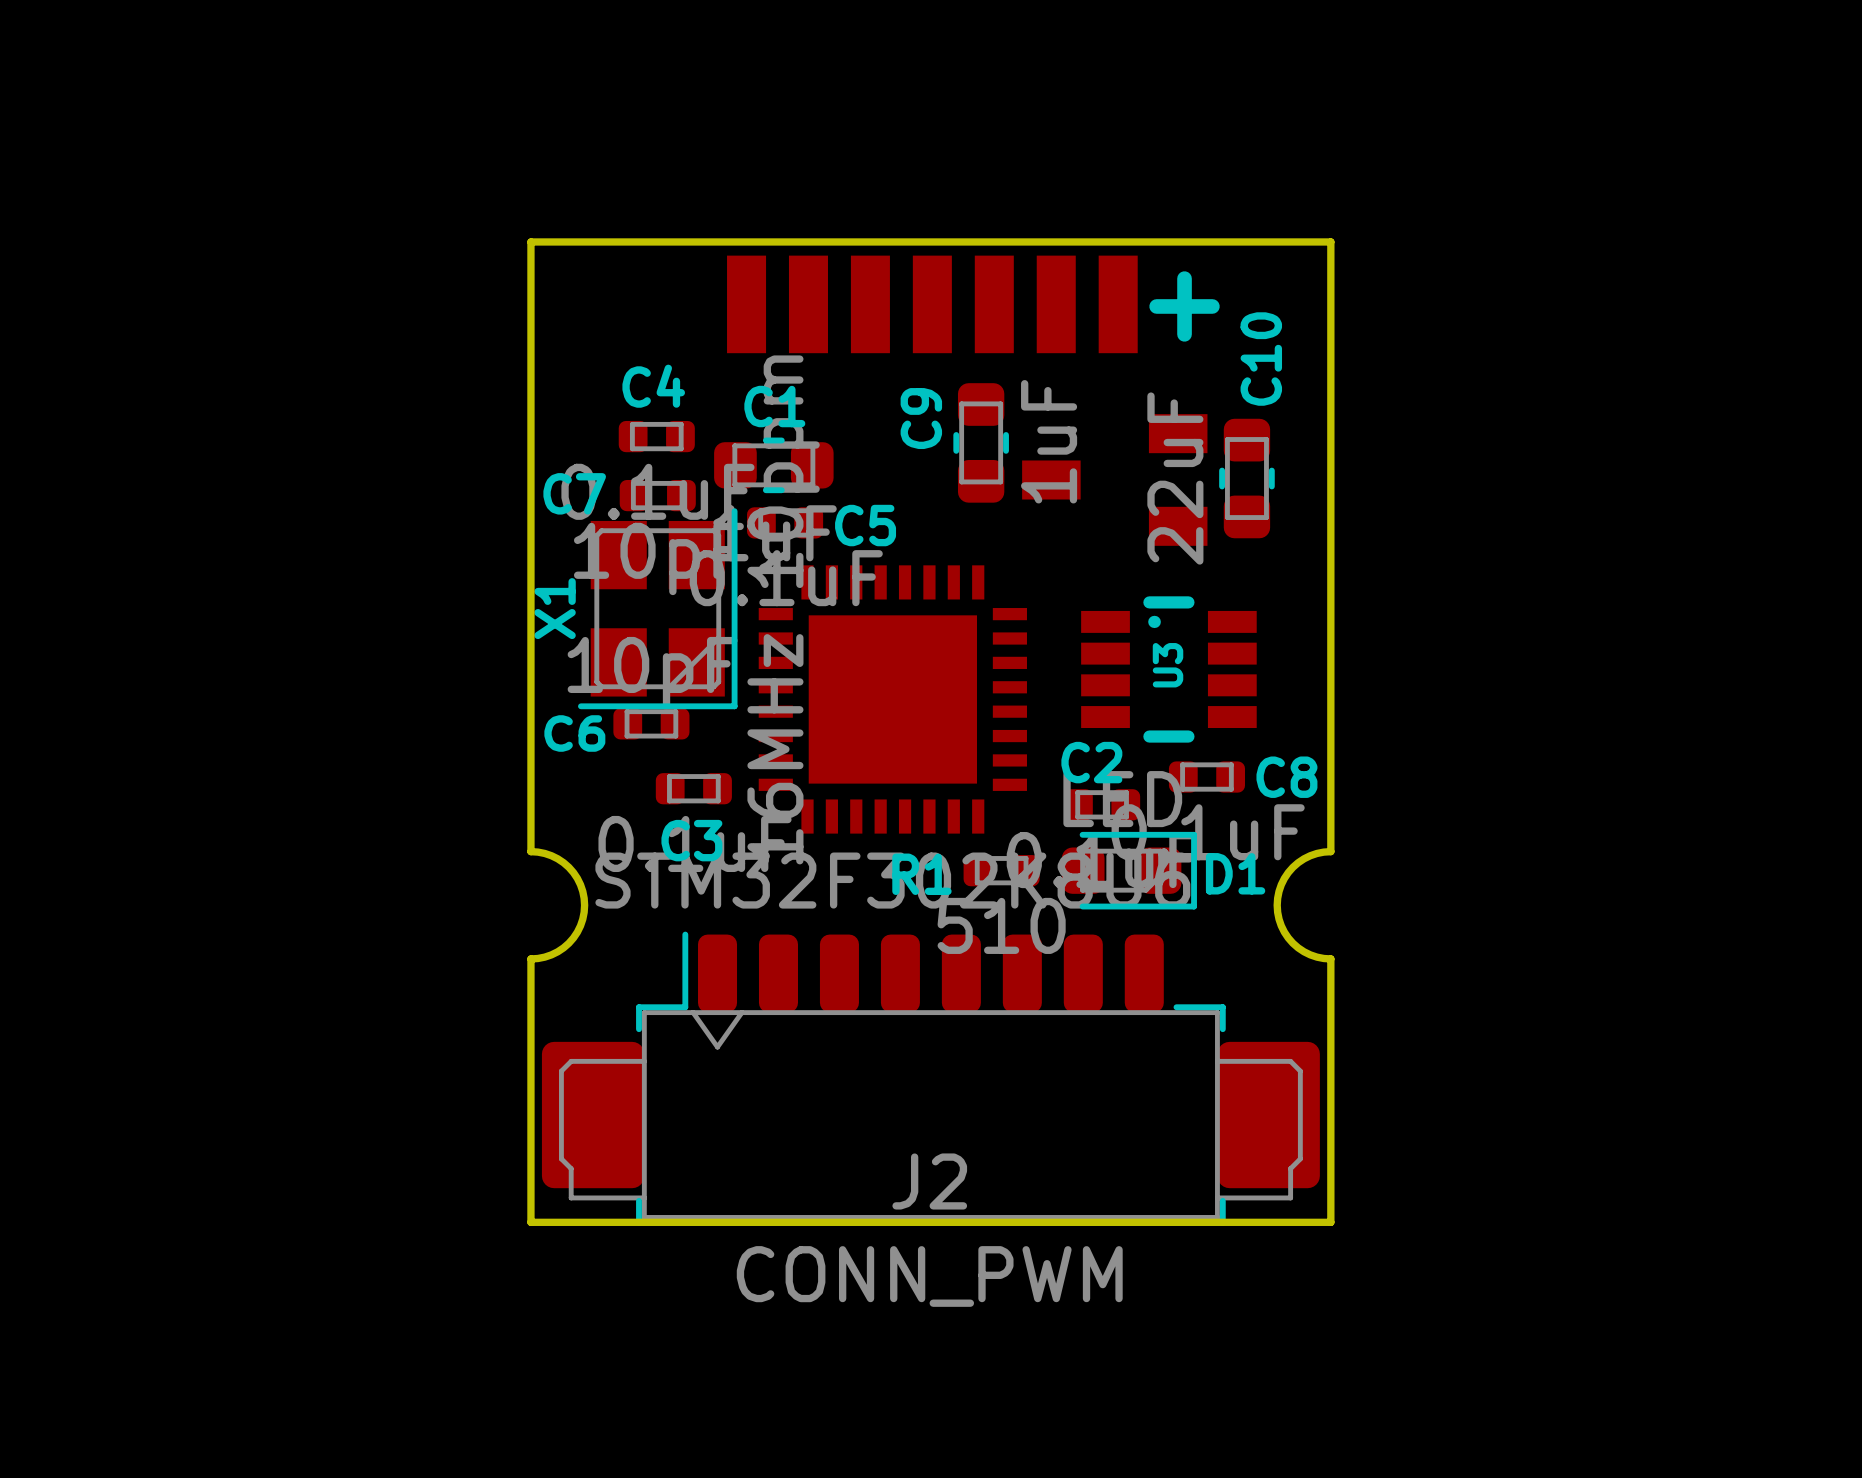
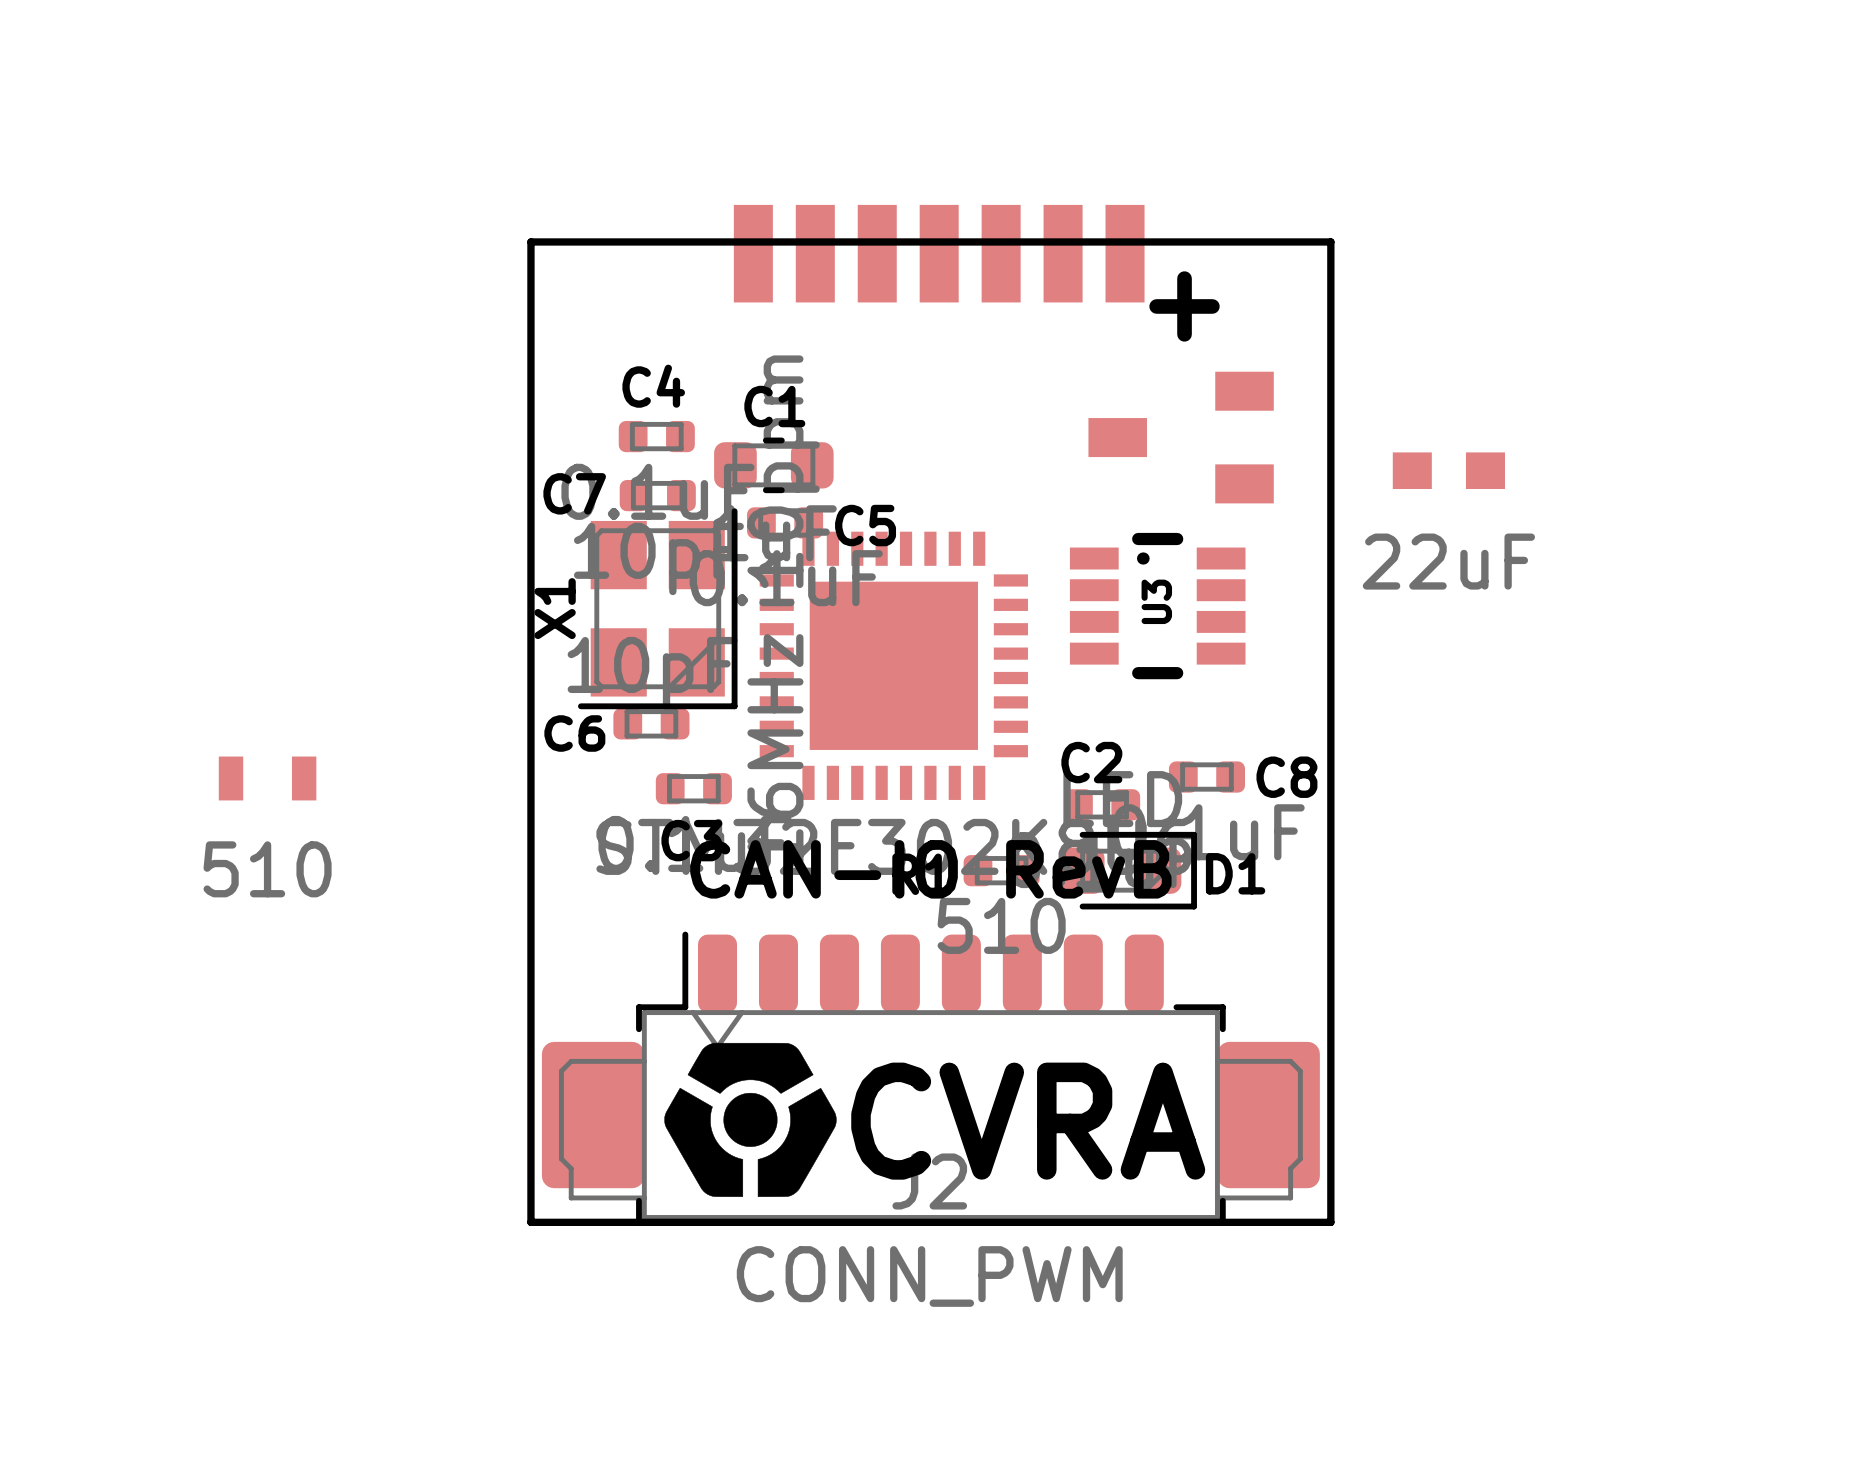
part position: (932, 304) -> (939, 253)
C9: 1uF (981, 442) -> none
part: none -> 22uF (1448, 470)
C10: 22uF (1246, 478) -> none
part position: (1114, 479) -> (1181, 437)
U3 position: (1168, 669) -> (1157, 606)
part position: (892, 699) -> (893, 665)
part: none -> 510 (267, 778)
board edge: (530, 851) (551, 855) (568, 867) (580, 884) (584, 905) (580, 925) (568, 943) (551, 954) (530, 958) -> (530, 851) (530, 958)
board edge: (1330, 851) (1310, 855) (1292, 867) (1281, 884) (1277, 905) (1281, 925) (1292, 943) (1310, 954) (1330, 958) -> (1330, 851) (1330, 958)
text: none -> CAN-IO RevB (930, 869)
drawing: none -> [664, 1042, 837, 1197]
text: none -> CVRA (1028, 1121)

